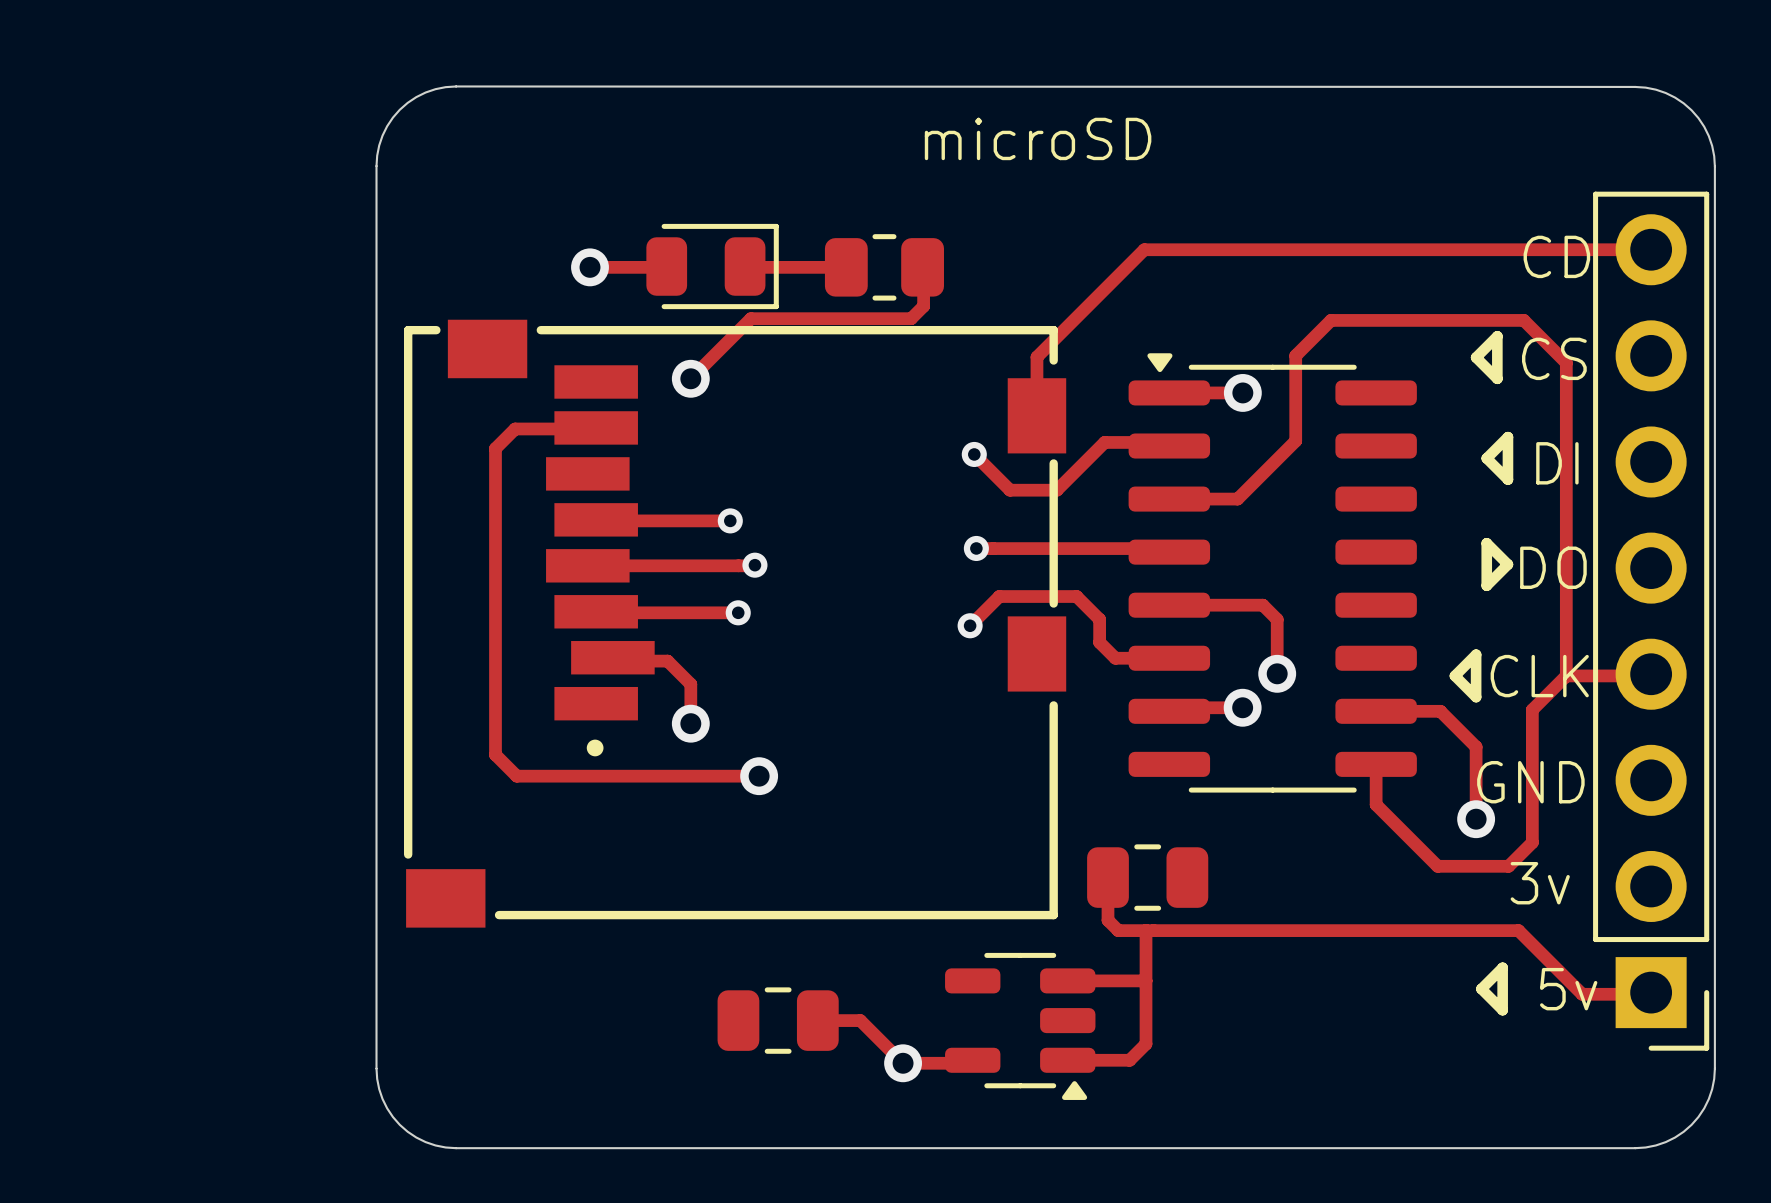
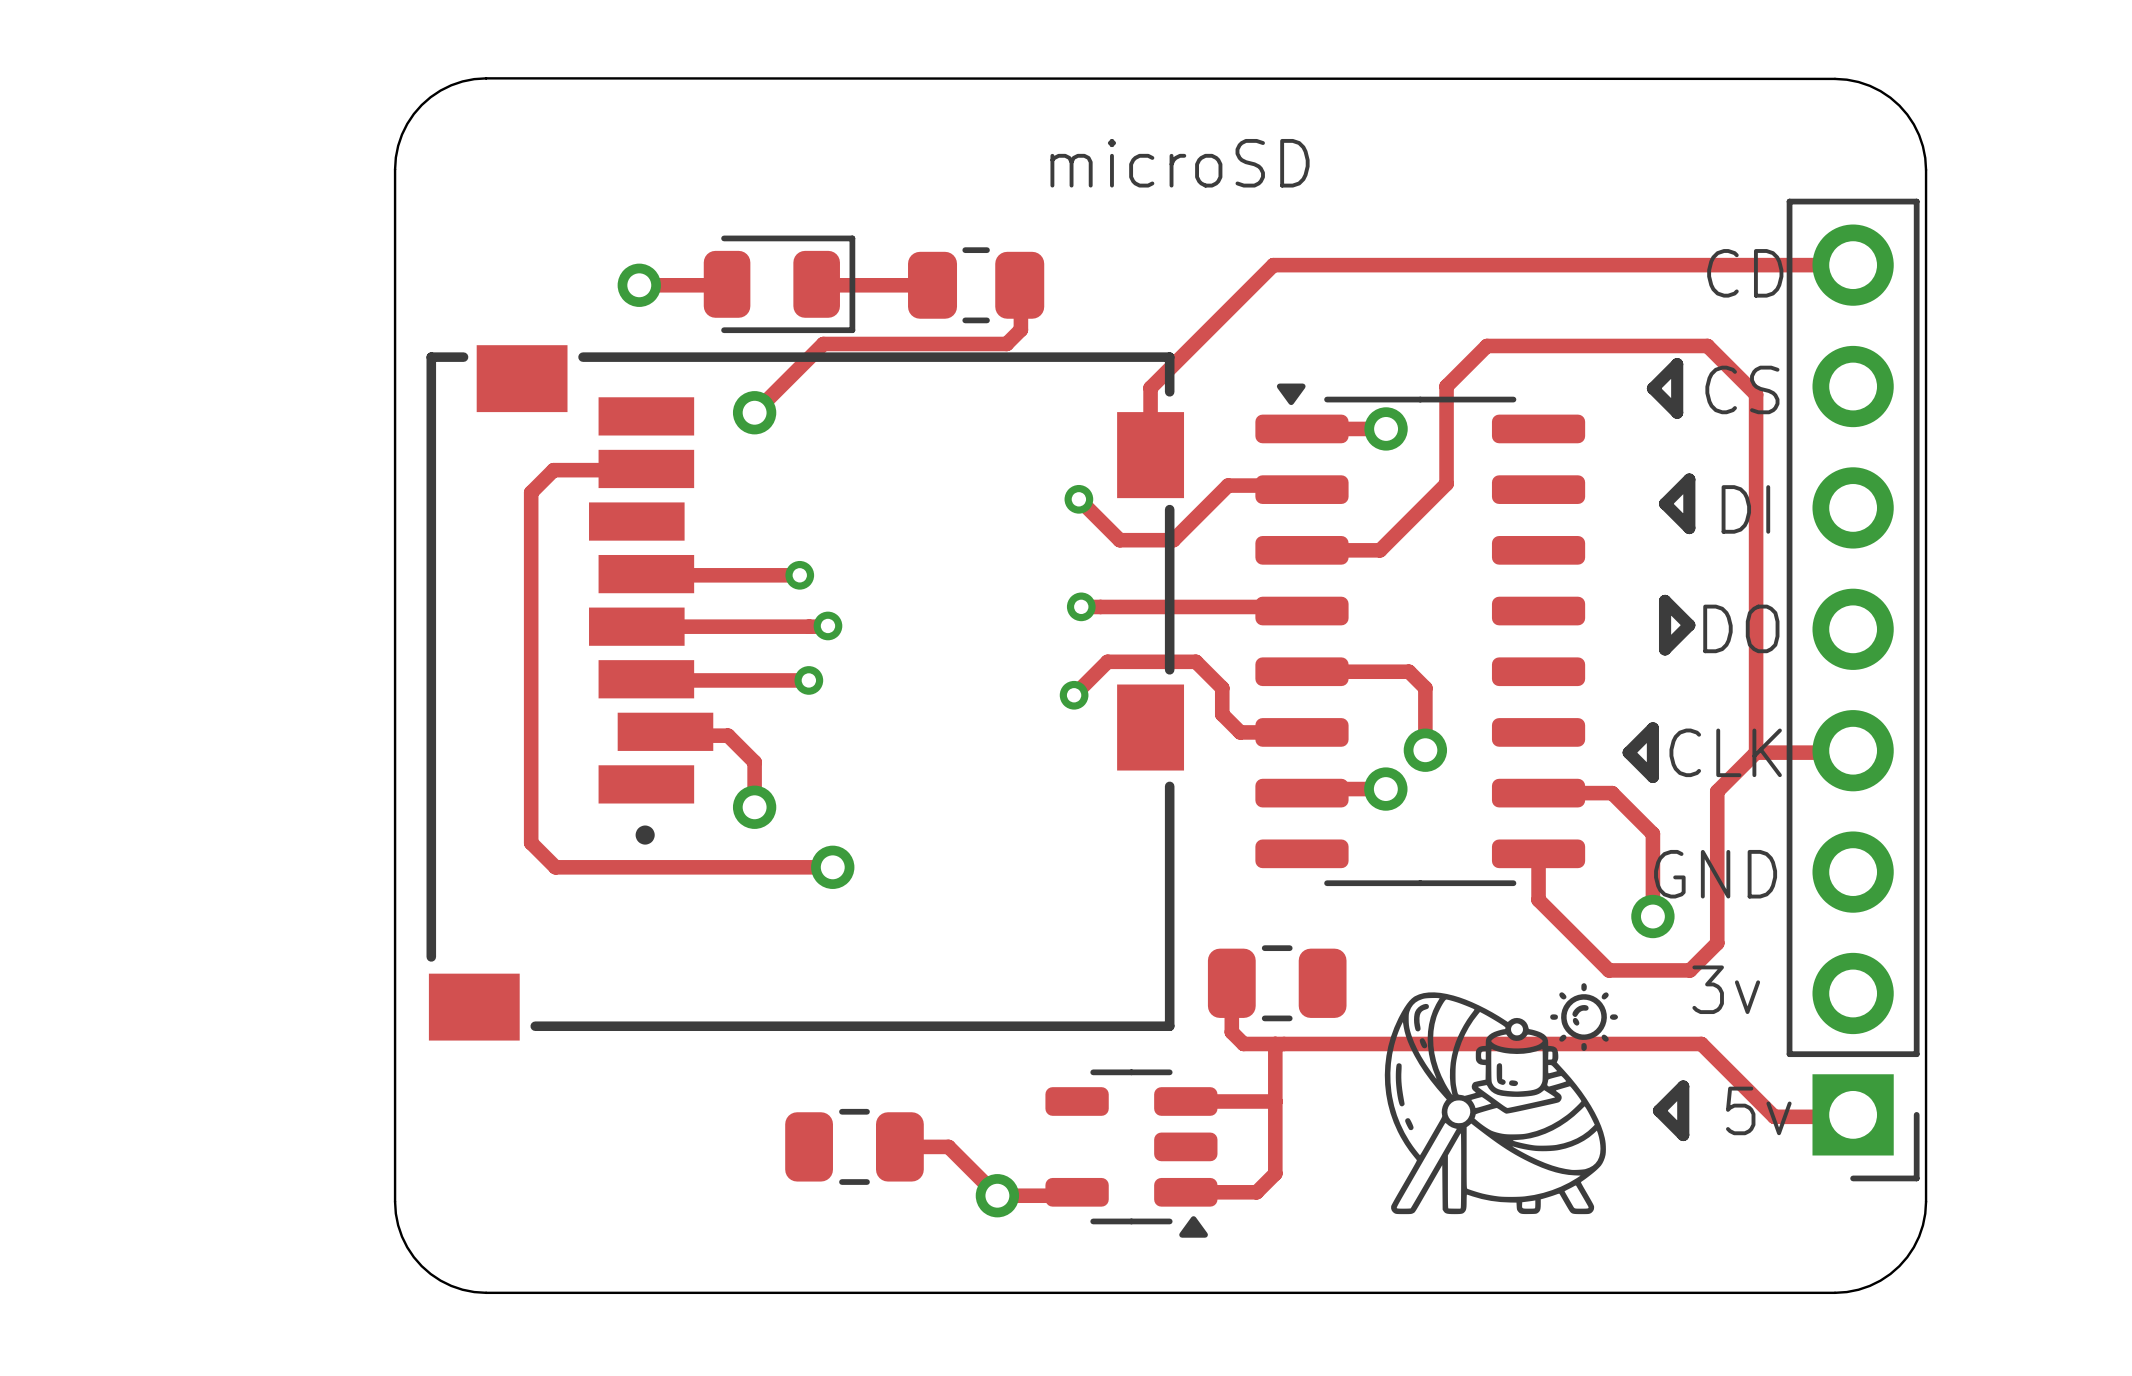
text position: microSD (1038, 138) -> microSD (1180, 163)
drawing: none -> [1384, 983, 1619, 1215]

